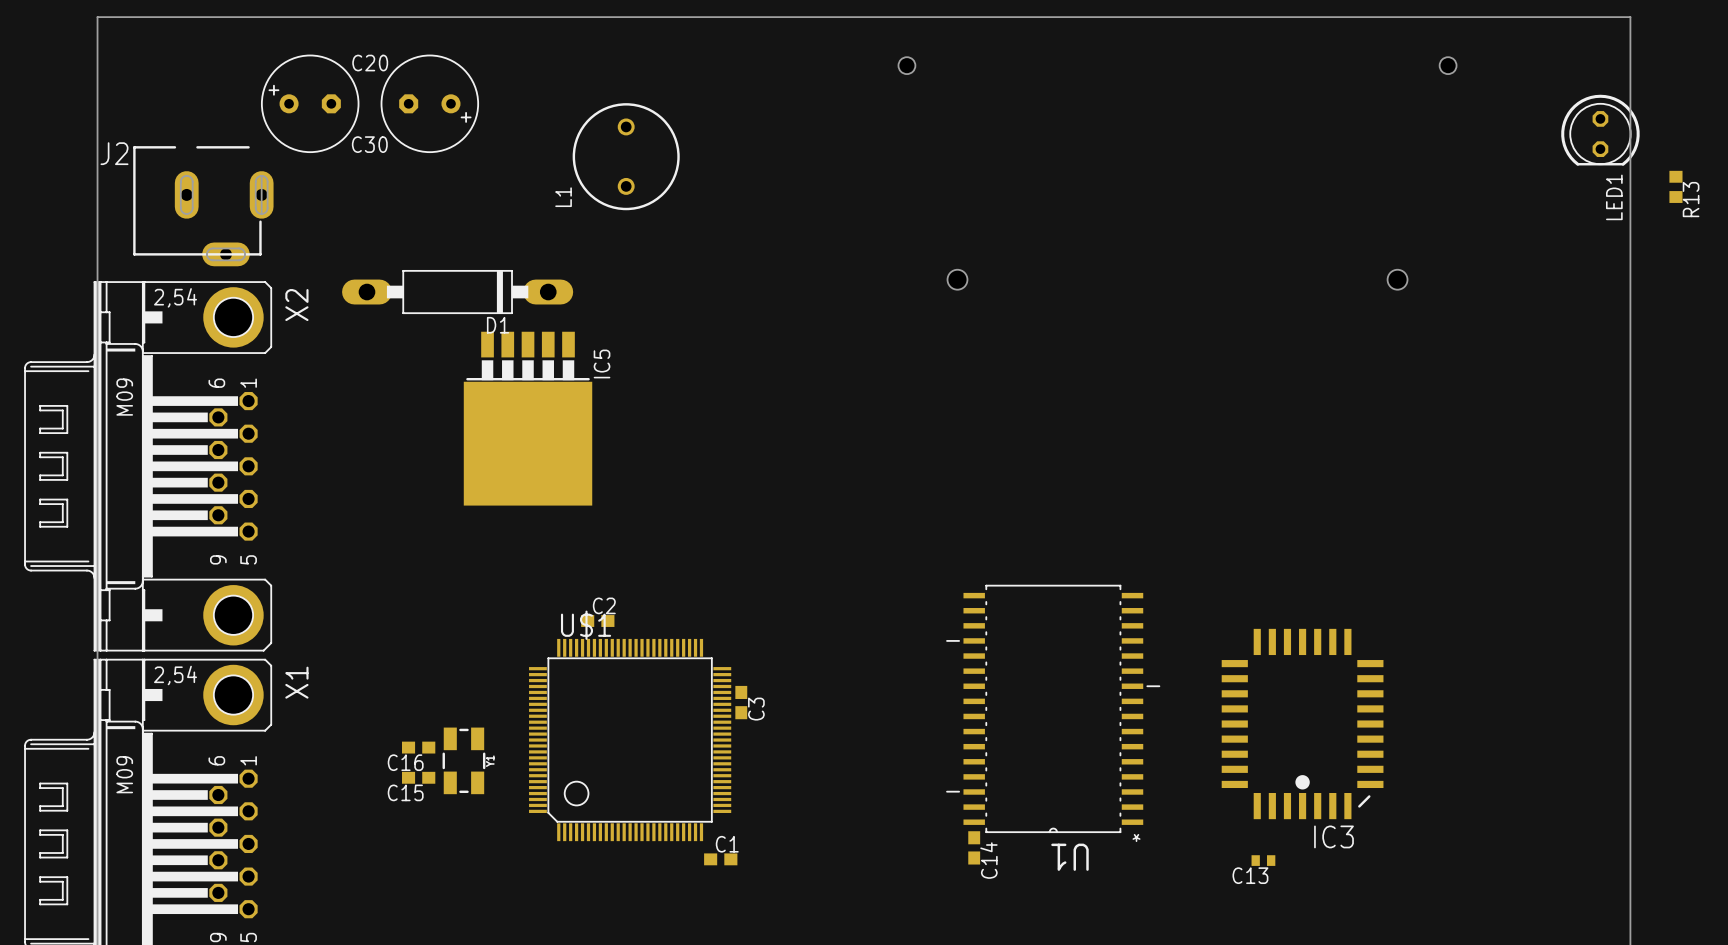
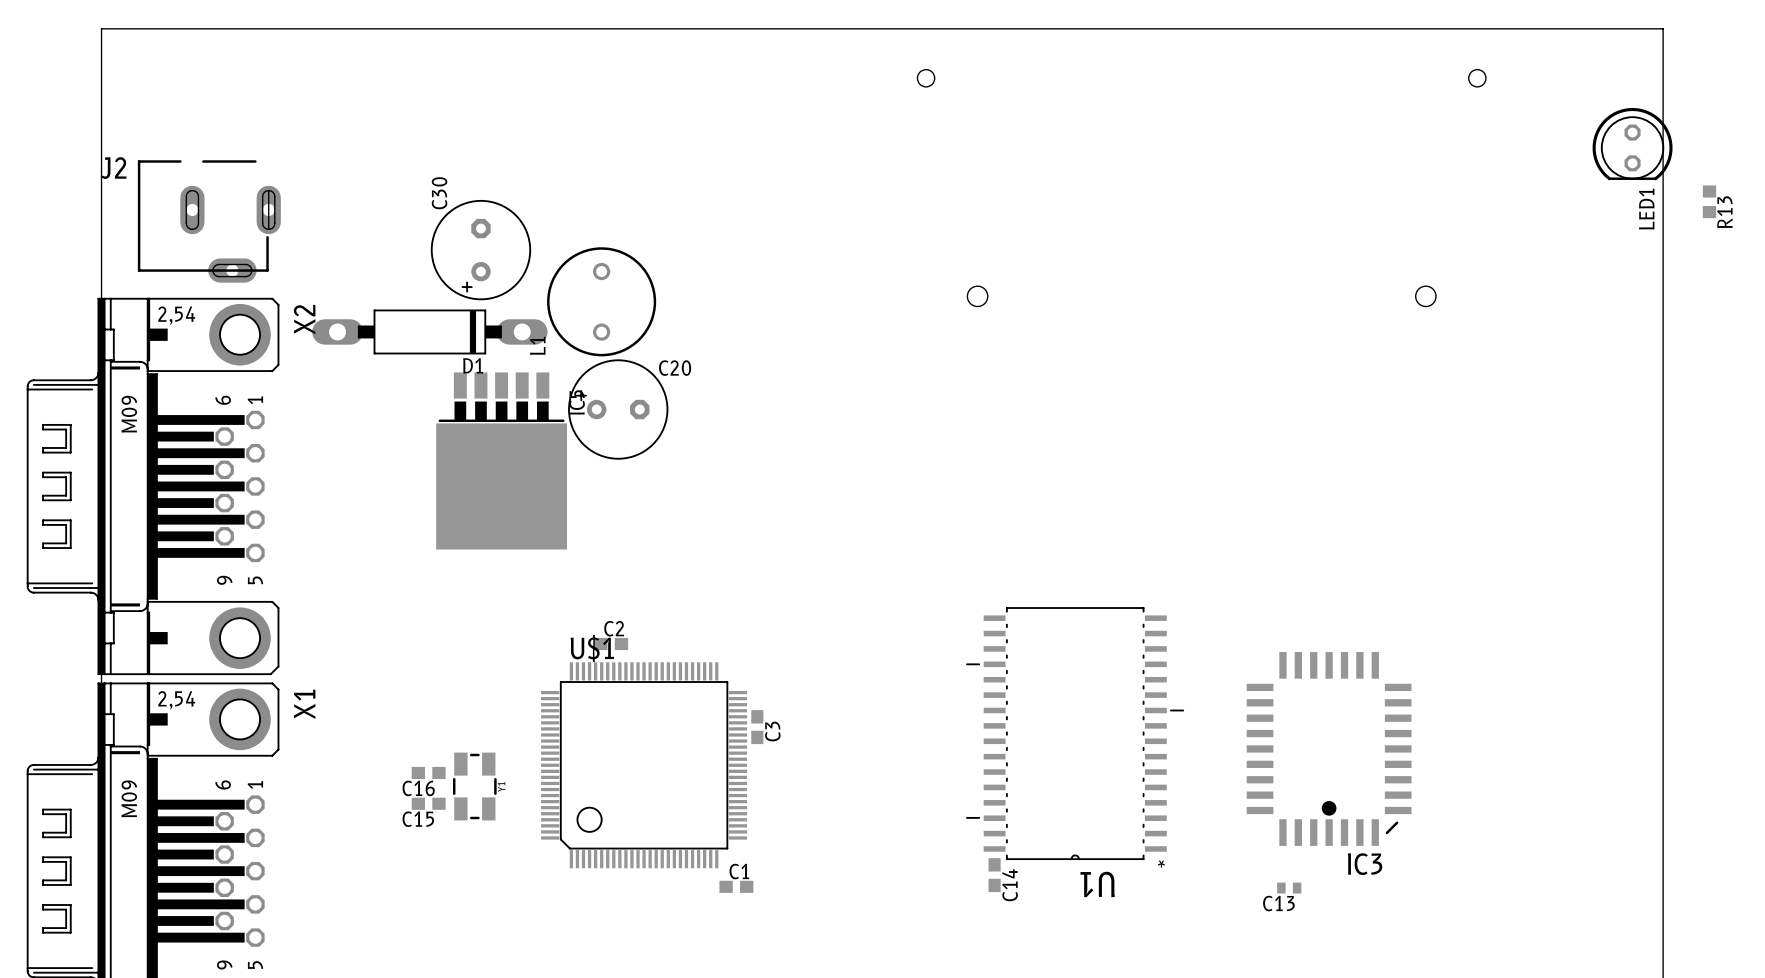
C20 position: (310, 103) -> (618, 409)
C30 rotation: 0° (429, 103) -> 90° clockwise (480, 250)
C30 position: (429, 103) -> (480, 250)
L1 position: (626, 156) -> (601, 301)
D1 position: (457, 292) -> (429, 331)
IC5 position: (528, 418) -> (501, 460)

